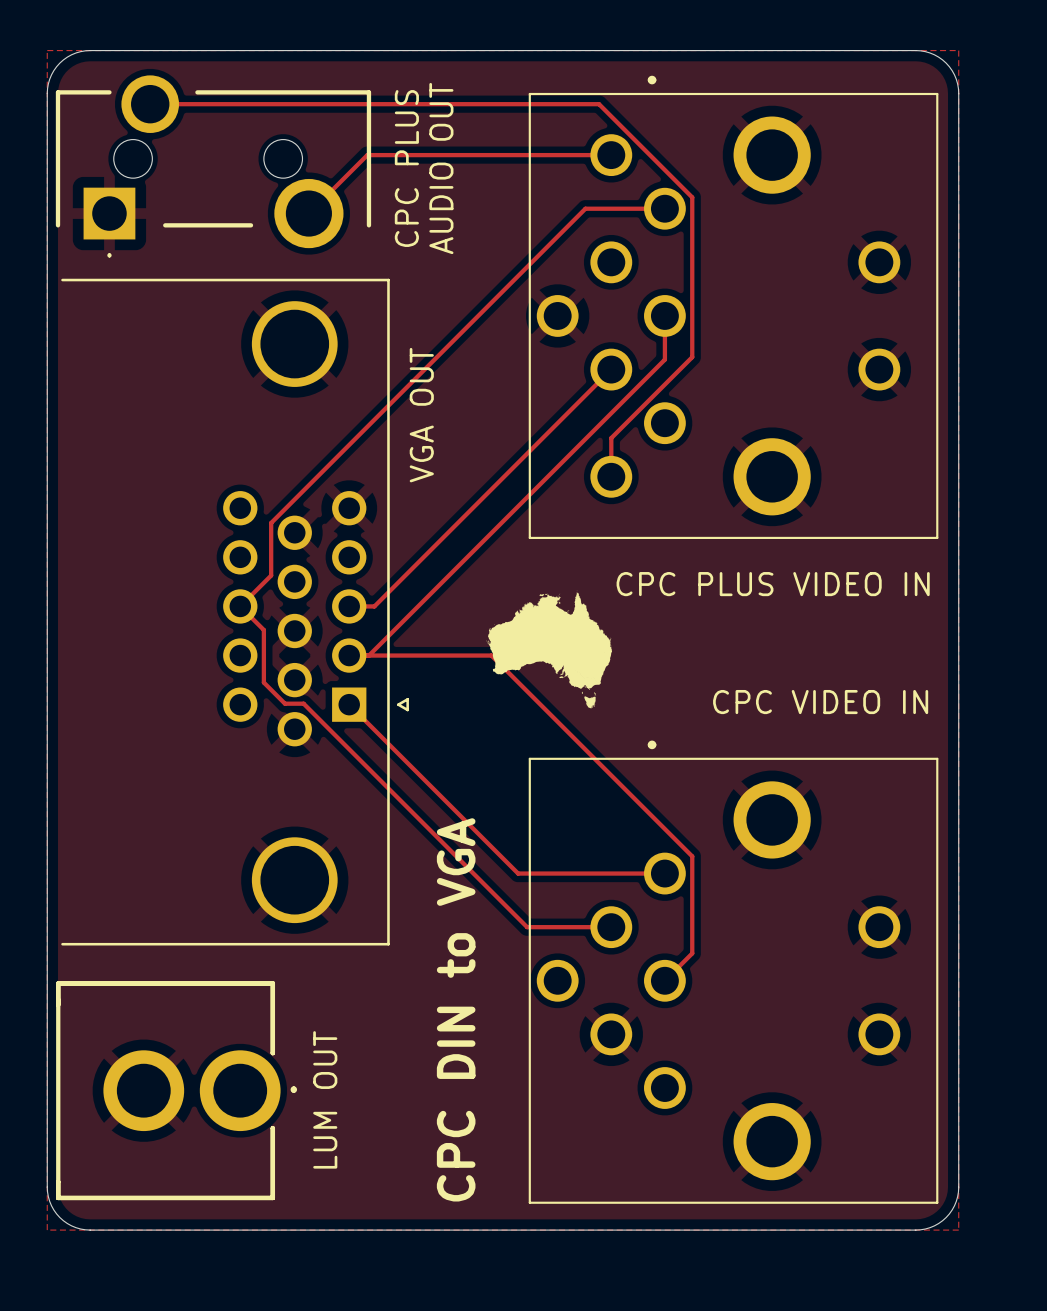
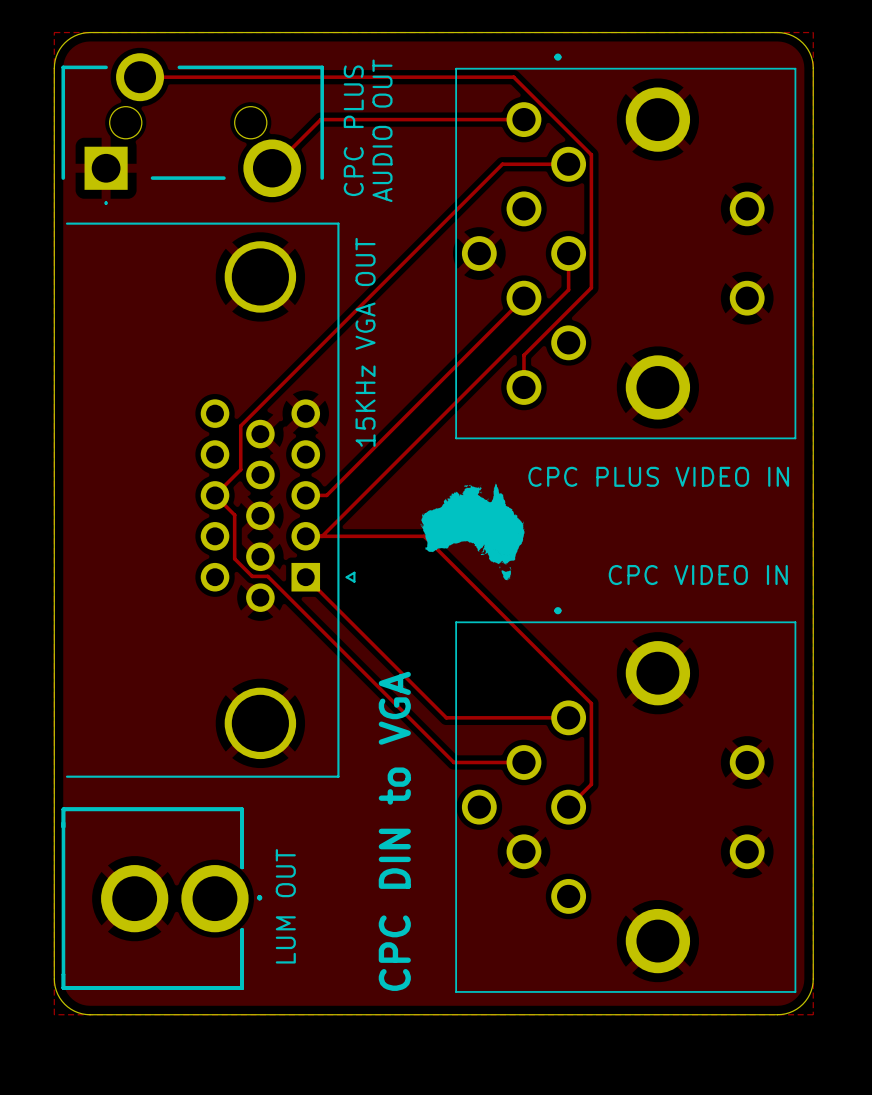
part value: VGA OUT (421, 415) -> 15KHz VGA OUT (365, 342)

